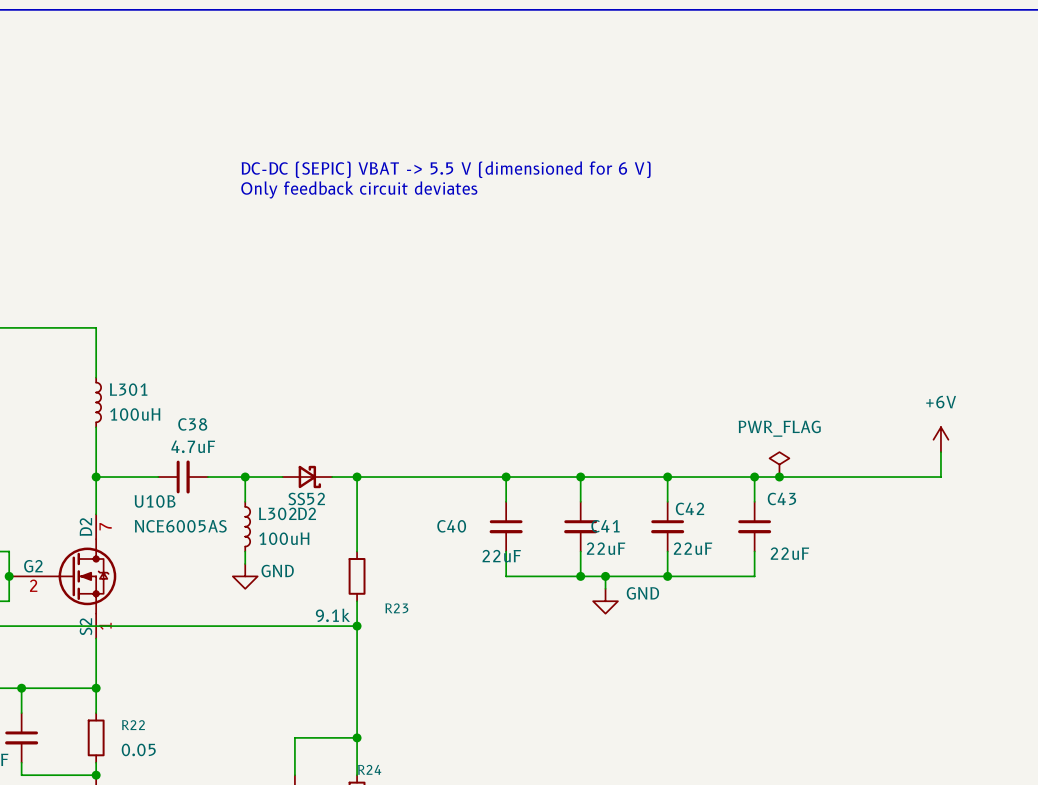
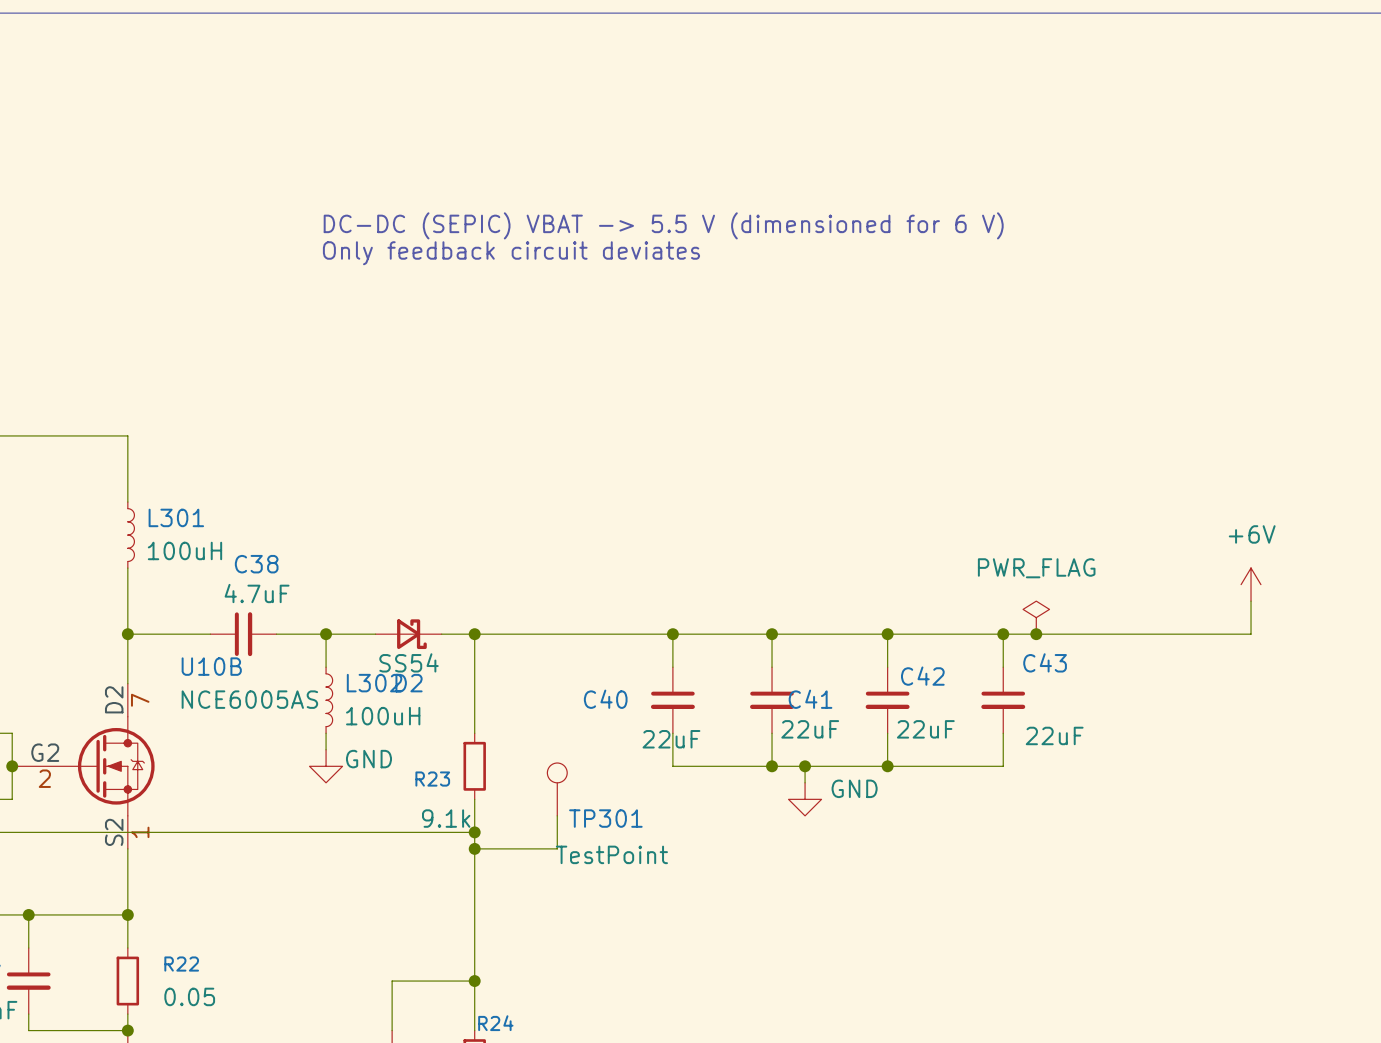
D2 value: SS52 (306, 498) -> SS54 (409, 662)
TP301: none -> TestPoint (557, 789)
R23 name position: R23 (396, 608) -> R23 (432, 779)
wire: none -> (557, 815) (557, 848) (474, 848)
junction: none -> (474, 848)

